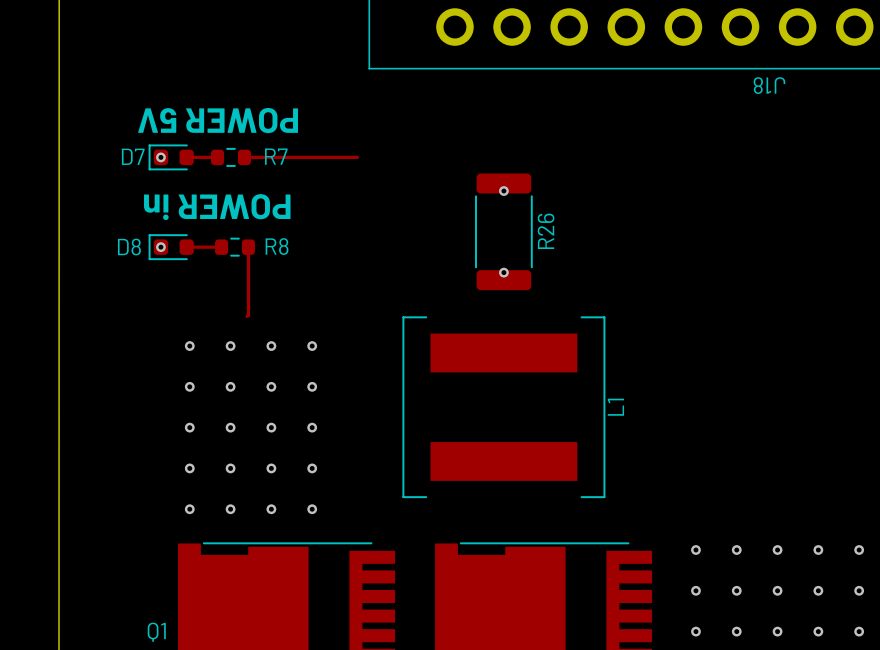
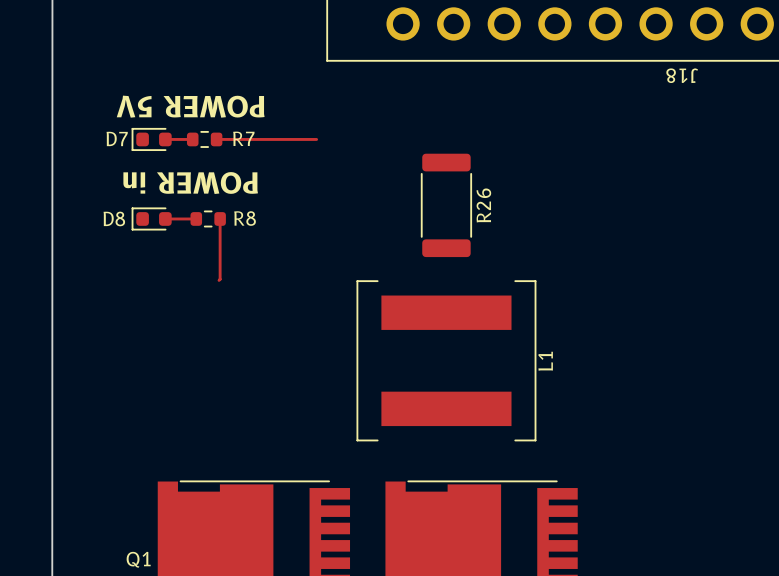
via: (160, 157) -> none
via: (503, 191) -> none
via: (160, 247) -> none
via: (503, 272) -> none
via: (189, 346) -> none
via: (230, 346) -> none
via: (271, 346) -> none
via: (312, 346) -> none
via: (189, 386) -> none
via: (230, 386) -> none
via: (271, 386) -> none
via: (312, 386) -> none
via: (189, 427) -> none
via: (230, 427) -> none
via: (271, 427) -> none
via: (312, 427) -> none
via: (189, 468) -> none
via: (230, 468) -> none
via: (271, 468) -> none
via: (312, 468) -> none
via: (189, 509) -> none
via: (230, 509) -> none
via: (271, 509) -> none
via: (312, 509) -> none
via: (695, 550) -> none
via: (736, 550) -> none
via: (777, 550) -> none
via: (818, 550) -> none
via: (859, 550) -> none
via: (695, 590) -> none
via: (736, 590) -> none
via: (777, 590) -> none
via: (818, 590) -> none
via: (859, 590) -> none
via: (695, 631) -> none
via: (736, 631) -> none
via: (777, 631) -> none
via: (818, 631) -> none
via: (859, 631) -> none

